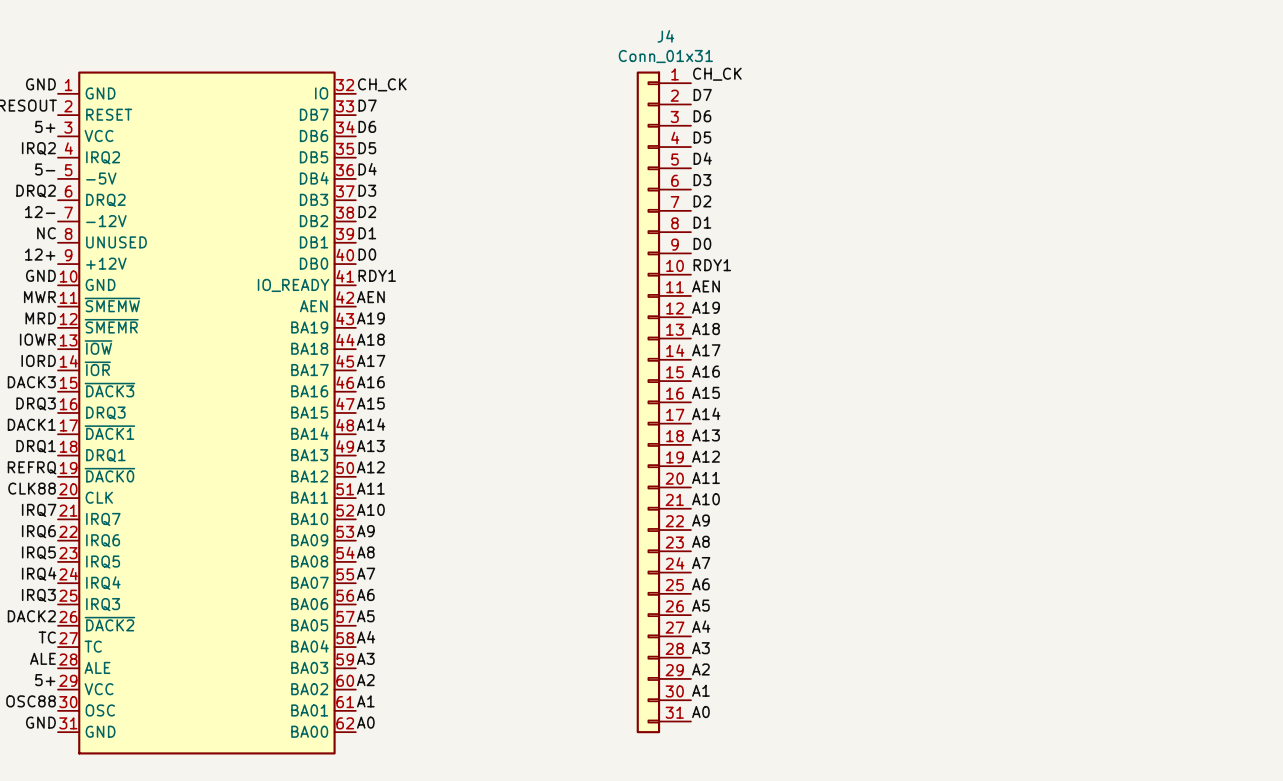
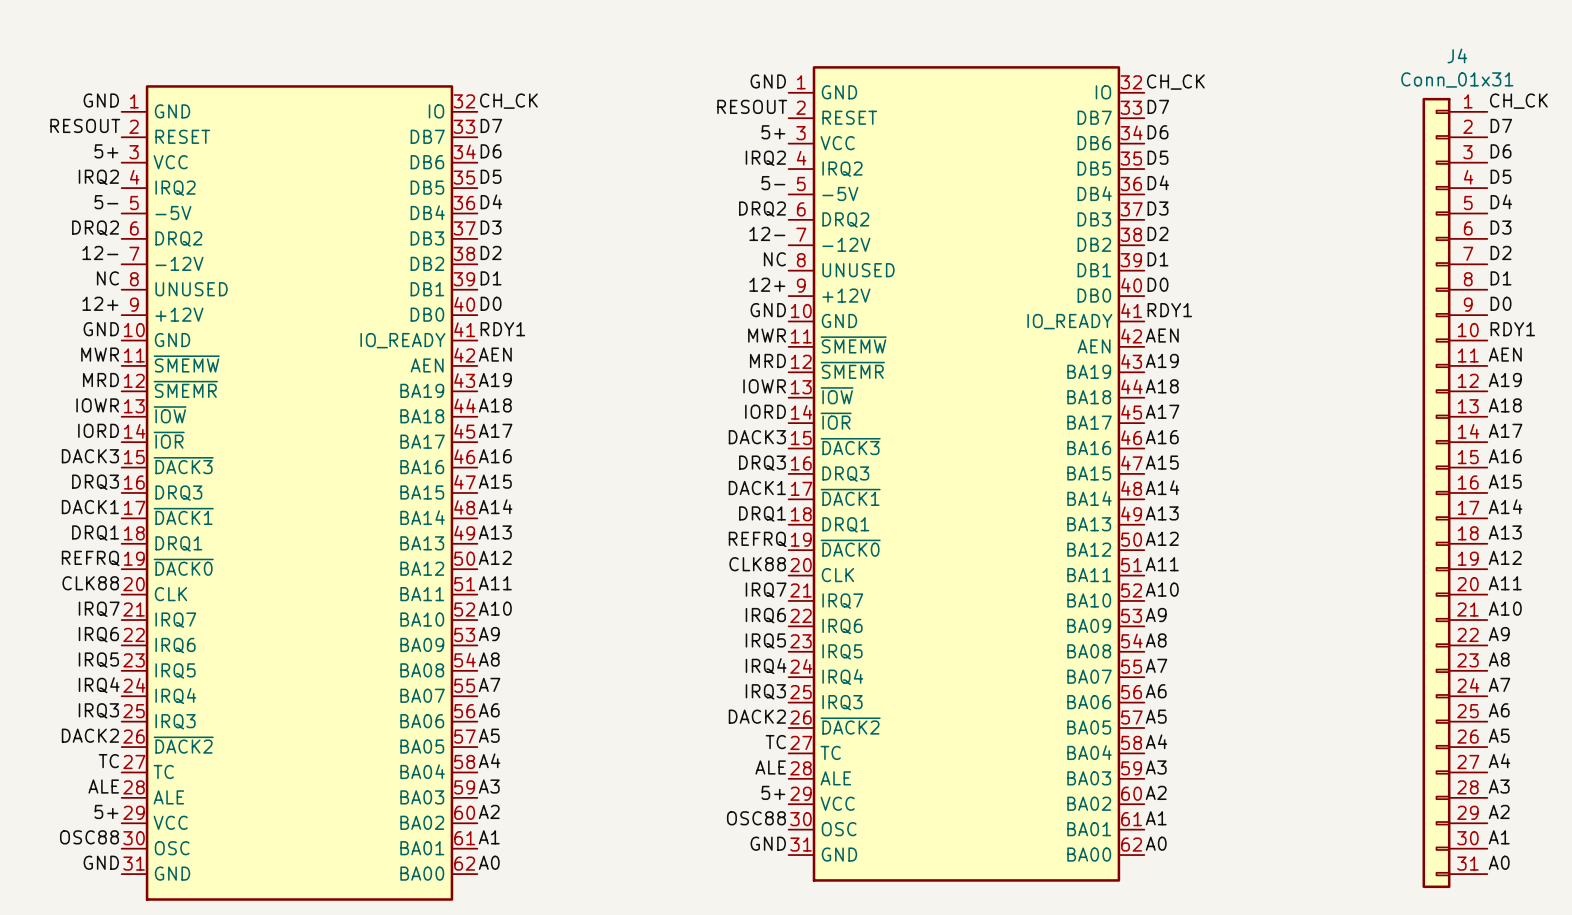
label: none -> GND (768, 81)
label: none -> CH_CK (1175, 82)
label: CH_CK (717, 74) -> none
label: none -> CH_CK (1518, 101)
label: none -> RESOUT (752, 106)
label: none -> D7 (1158, 106)
label: D7 (702, 94) -> none
label: none -> D7 (1501, 125)
label: none -> 5+ (773, 132)
label: none -> D6 (1158, 132)
label: D6 (702, 116) -> none
label: none -> D6 (1501, 151)
label: none -> IRQ2 (765, 158)
label: none -> D5 (1158, 157)
label: D5 (702, 137) -> none
label: none -> D5 (1501, 176)
label: none -> 5- (773, 183)
label: none -> D4 (1158, 182)
label: D4 (702, 158) -> none
label: none -> D4 (1501, 201)
label: none -> D3 (1158, 208)
label: none -> DRQ2 (762, 209)
label: D3 (702, 180) -> none
label: none -> D3 (1501, 227)
label: none -> 12- (767, 233)
label: none -> D2 (1158, 233)
label: D2 (702, 201) -> none
label: none -> D2 (1501, 252)
label: none -> NC (774, 259)
label: none -> D1 (1158, 259)
label: D1 (702, 222) -> none
label: none -> D1 (1501, 278)
label: none -> 12+ (767, 284)
label: none -> D0 (1158, 284)
label: D0 (702, 243) -> none
label: none -> D0 (1501, 303)
label: none -> GND (768, 310)
label: none -> RDY1 (1169, 310)
label: RDY1 (712, 265) -> none
label: none -> RDY1 (1512, 329)
label: none -> MWR (767, 335)
label: none -> AEN (1162, 335)
label: AEN (705, 286) -> none
label: none -> AEN (1505, 354)
label: none -> MRD (767, 360)
label: none -> A19 (1162, 360)
label: A19 (705, 307) -> none
label: none -> A19 (1505, 380)
label: none -> IOWR (764, 386)
label: none -> A18 (1162, 386)
label: A18 (705, 329) -> none
label: none -> A18 (1505, 405)
label: none -> IORD (765, 411)
label: none -> A17 (1162, 411)
label: A17 (706, 350) -> none
label: none -> A17 (1505, 430)
label: none -> DACK3 (757, 437)
label: none -> A16 (1162, 437)
label: A16 (705, 371) -> none
label: none -> A16 (1505, 456)
label: none -> A15 (1162, 462)
label: none -> DRQ3 (762, 463)
label: A15 (705, 392) -> none
part: none -> (966, 473)
J4 position: (663, 402) -> (1454, 492)
label: none -> A15 (1505, 481)
label: none -> DACK1 (757, 487)
label: none -> A14 (1162, 487)
label: A14 (706, 413) -> none
label: none -> A14 (1505, 506)
label: none -> DRQ1 (762, 514)
label: none -> A13 (1162, 513)
label: A13 (705, 435) -> none
label: none -> A13 (1505, 532)
label: none -> REFRQ (757, 539)
label: none -> A12 (1162, 538)
label: A12 (705, 456) -> none
label: none -> A12 (1505, 557)
label: none -> CLK88 (757, 564)
label: none -> A11 (1162, 564)
label: A11 (705, 477) -> none
label: none -> A11 (1505, 583)
label: none -> A10 (1162, 589)
label: none -> IRQ7 (766, 590)
label: A10 (705, 499) -> none
label: none -> A10 (1505, 608)
label: none -> IRQ6 (765, 615)
label: none -> A9 (1156, 615)
label: A9 (700, 520) -> none
label: none -> A9 (1499, 634)
label: none -> IRQ5 (765, 641)
label: none -> A8 (1156, 640)
label: A8 (700, 541) -> none
label: none -> A8 (1499, 659)
label: none -> A7 (1156, 665)
label: none -> IRQ4 (766, 666)
label: A7 (701, 563) -> none
label: none -> A7 (1499, 684)
label: none -> IRQ3 (765, 691)
label: none -> A6 (1156, 691)
label: A6 (700, 584) -> none
label: none -> A6 (1499, 710)
label: none -> DACK2 (757, 716)
label: none -> A5 (1156, 716)
label: A5 (700, 605) -> none
label: none -> A5 (1499, 735)
label: none -> TC (775, 742)
label: none -> A4 (1156, 741)
label: A4 (701, 626) -> none
label: none -> A4 (1499, 760)
label: none -> ALE (770, 767)
label: none -> A3 (1156, 767)
label: A3 (700, 648) -> none
label: none -> A3 (1499, 786)
label: none -> 5+ (773, 792)
label: none -> A2 (1156, 792)
label: A2 (700, 669) -> none
label: none -> A2 (1499, 811)
label: none -> OSC88 (756, 818)
label: none -> A1 (1156, 818)
label: A1 (700, 690) -> none
label: none -> A1 (1499, 837)
label: none -> GND (768, 843)
label: none -> A0 (1156, 843)
label: A0 (700, 712) -> none
label: none -> A0 (1499, 862)

